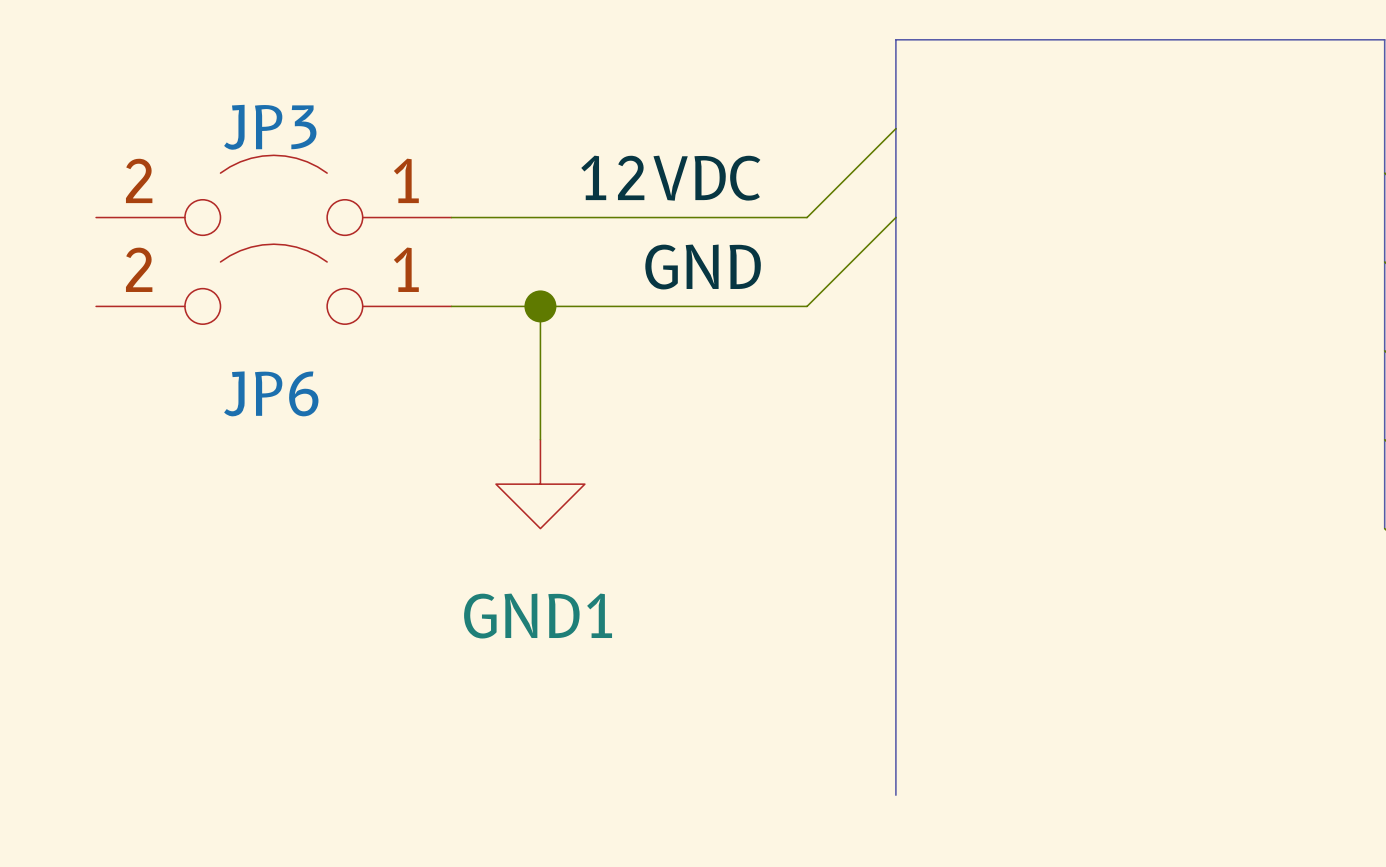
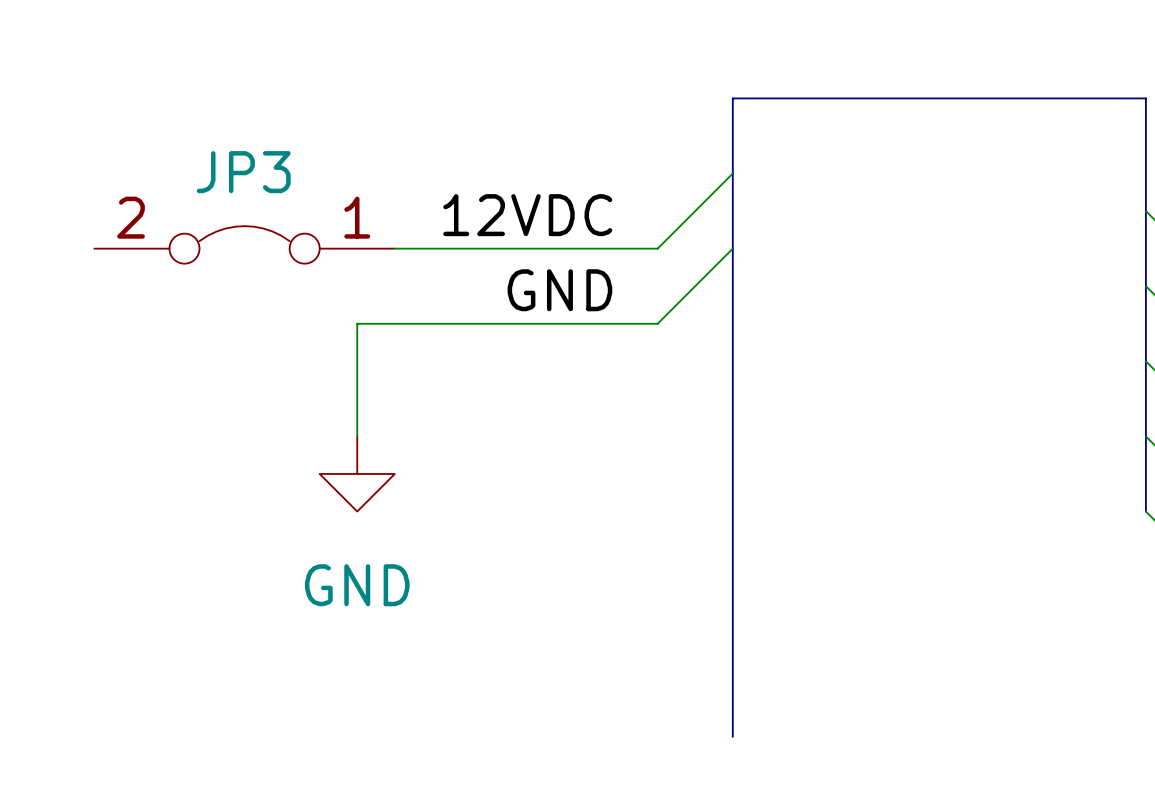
JP3 symbol: [96, 155, 452, 236] -> [94, 226, 395, 264]
JP6: (273, 284) -> none
wire: (540, 306) (540, 439) -> (357, 323) (357, 436)
junction: (540, 306) -> none
power symbol: none -> GND (357, 473)
power symbol: GND1 (540, 484) -> none

